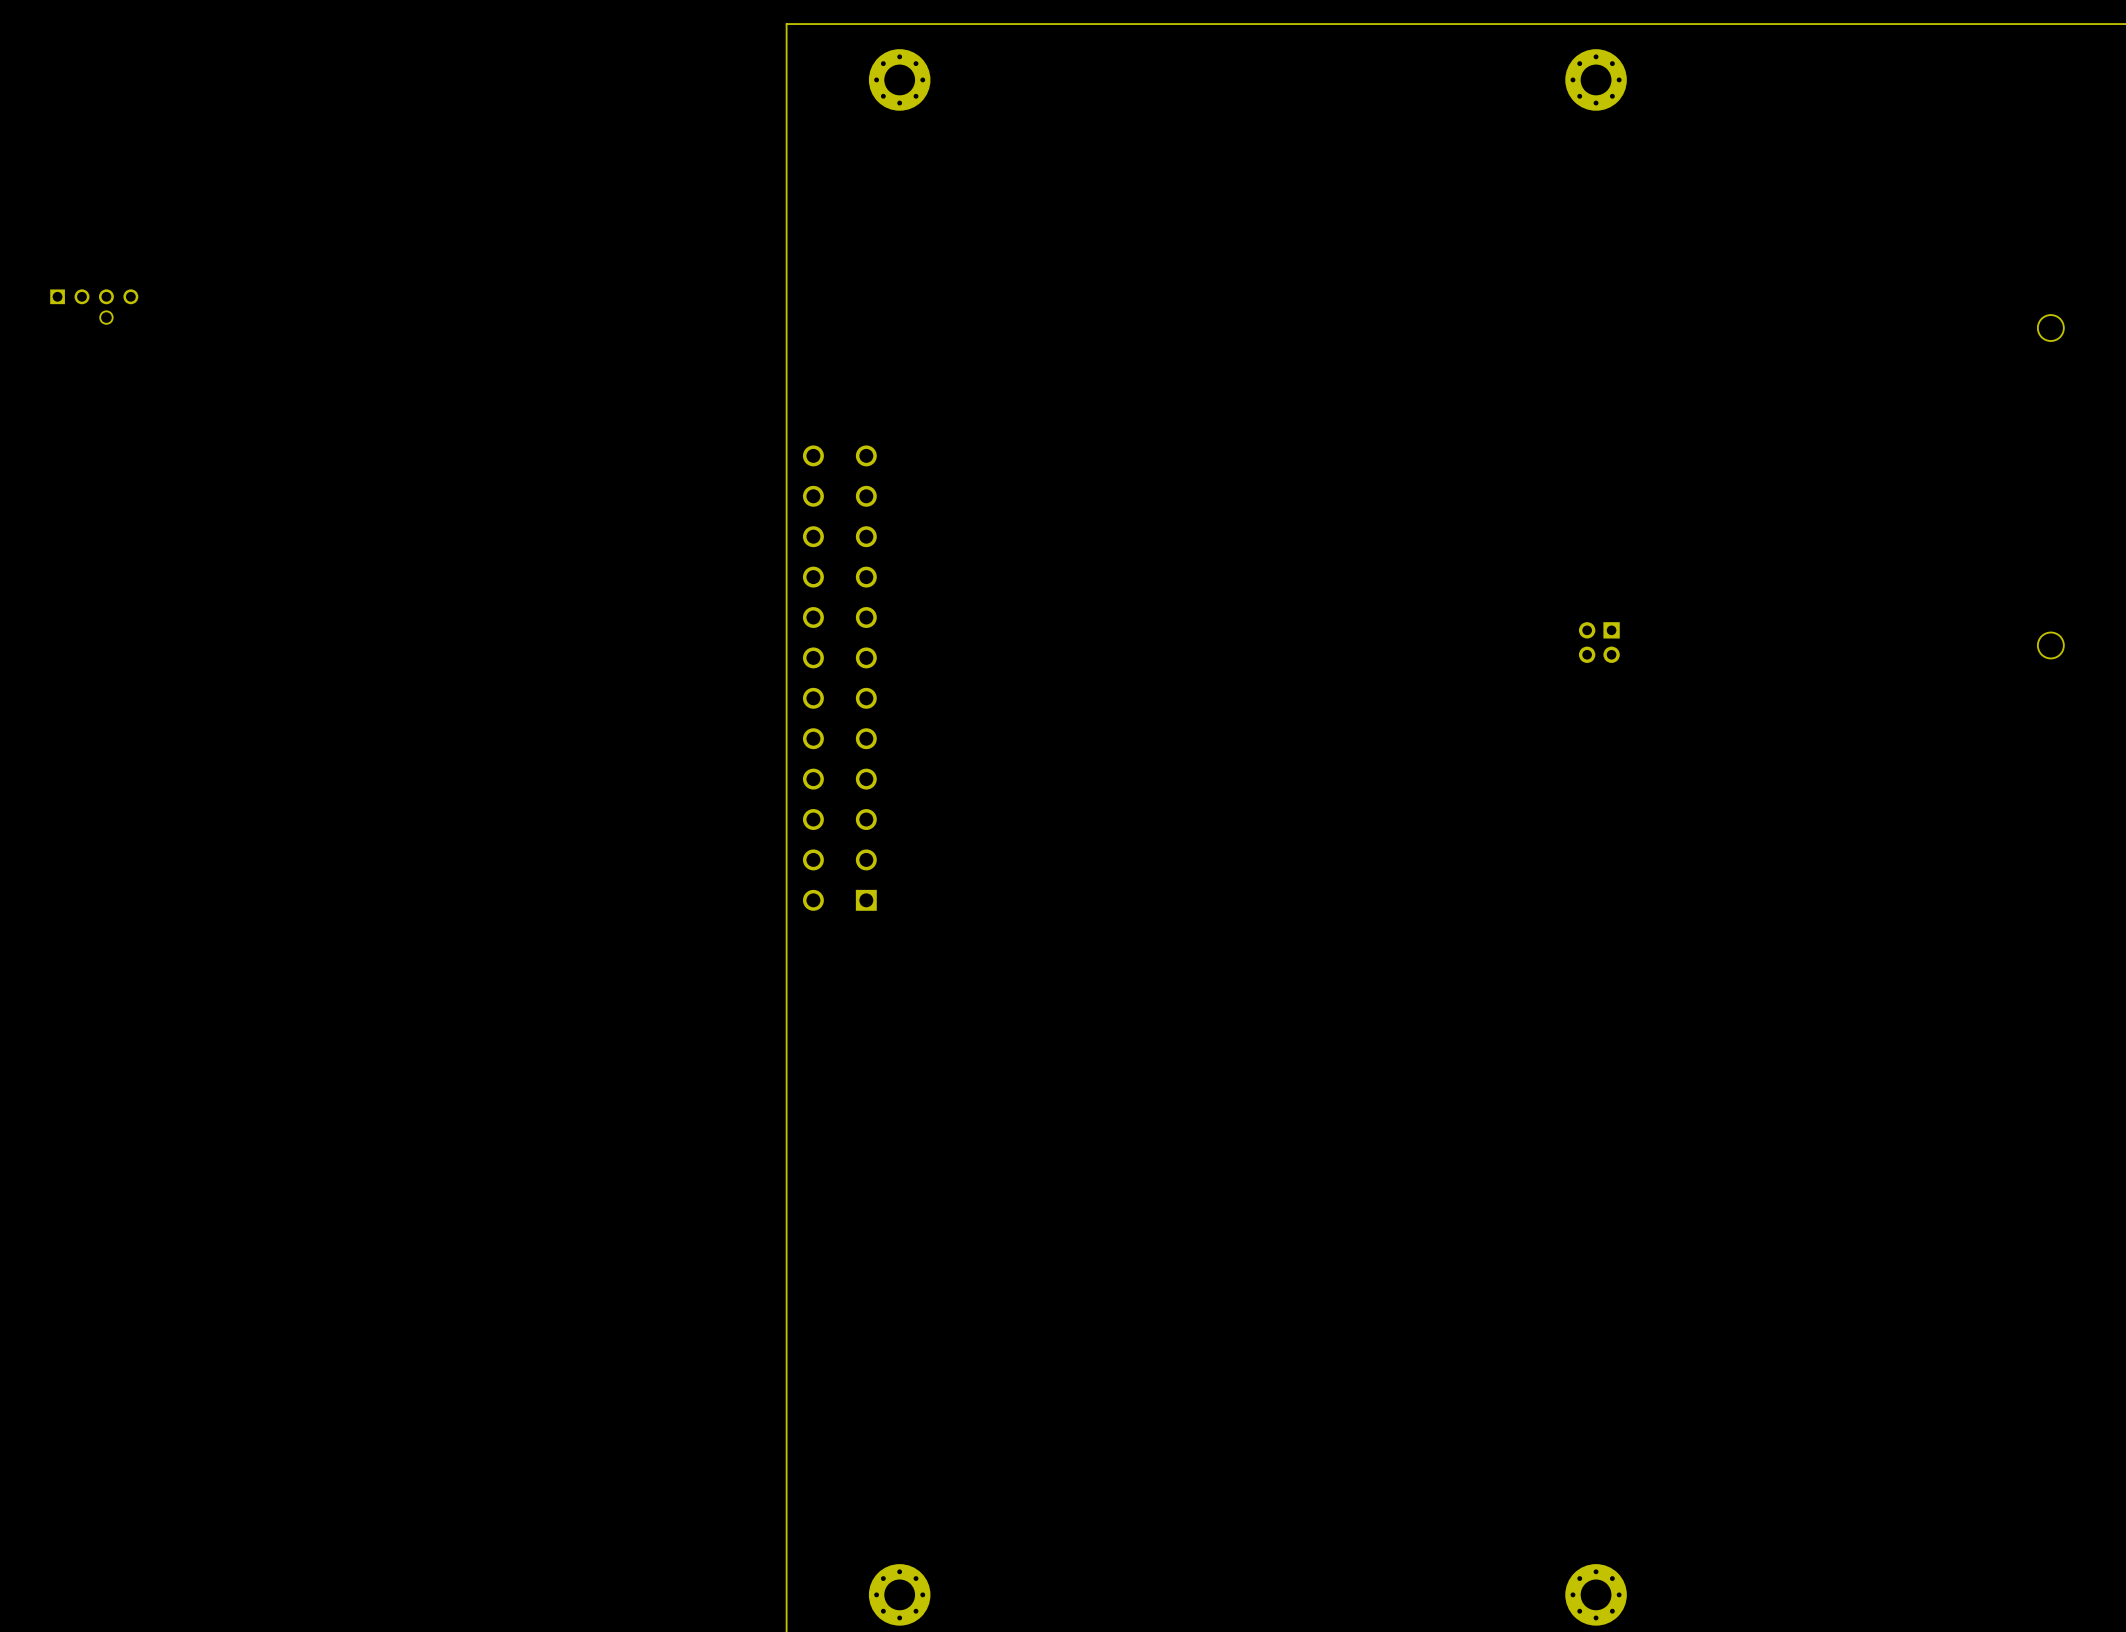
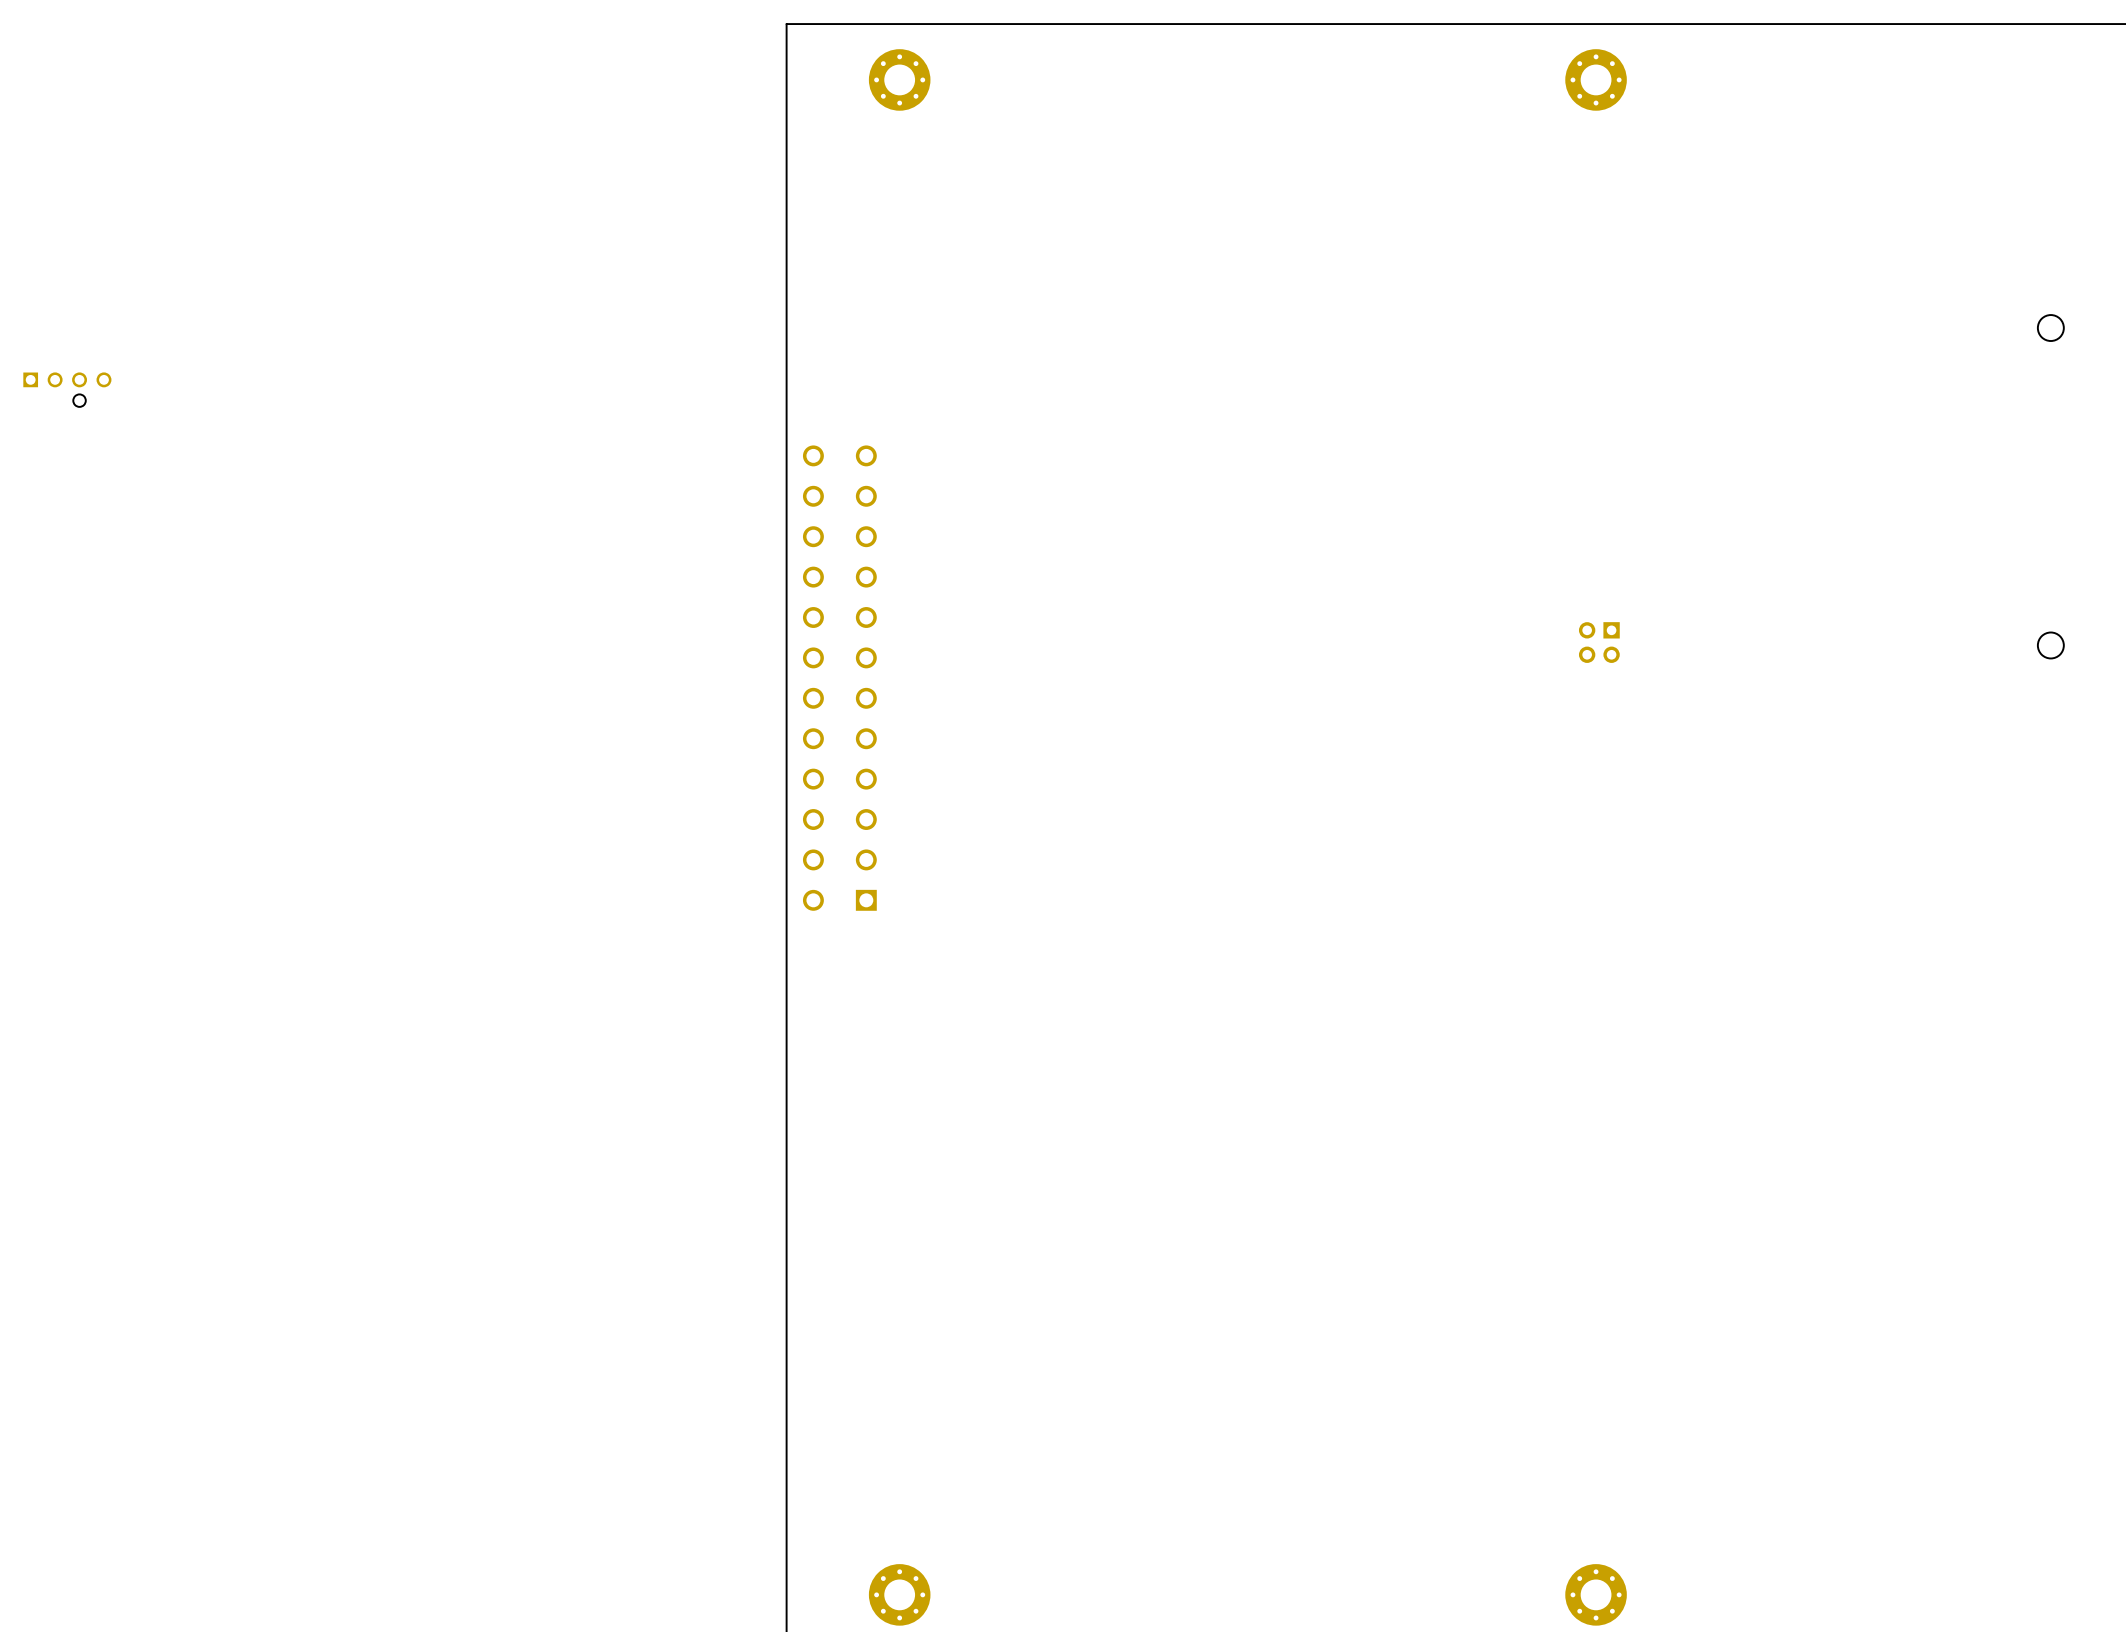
part position: (94, 306) -> (67, 389)

